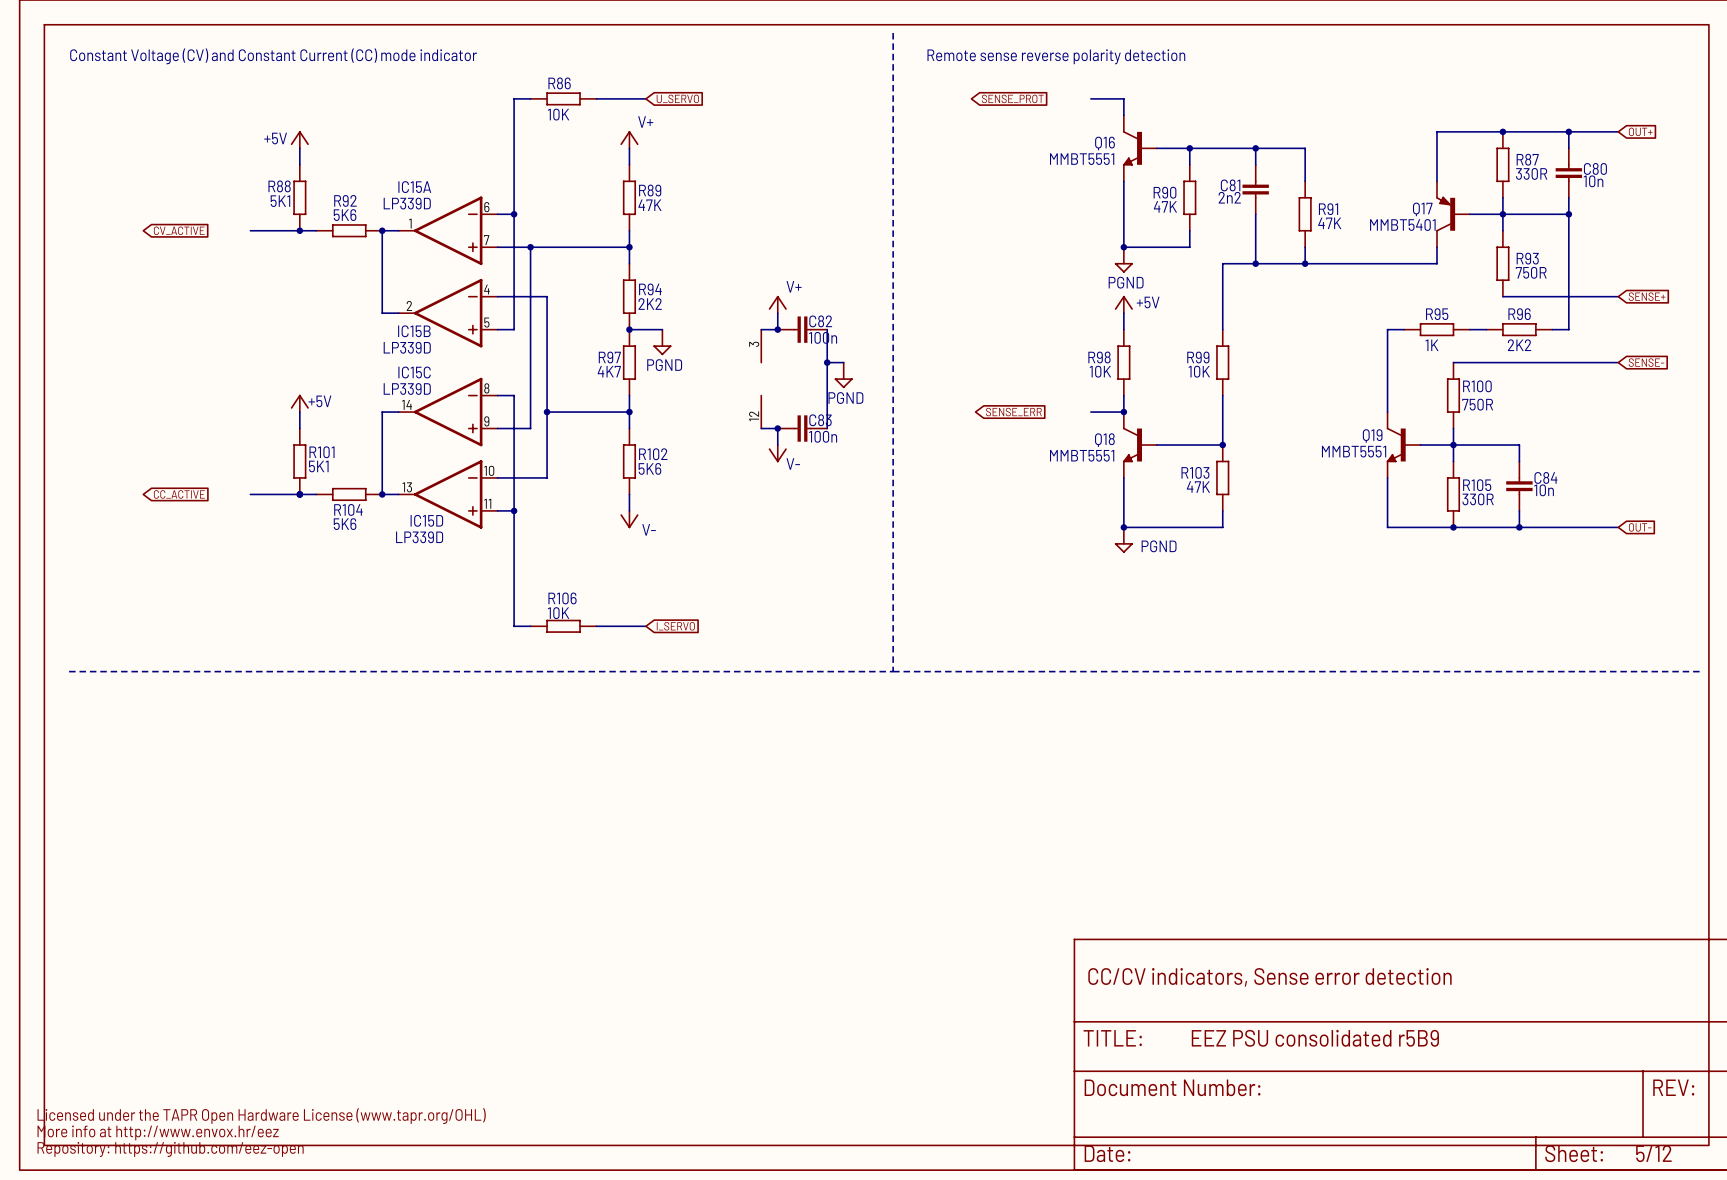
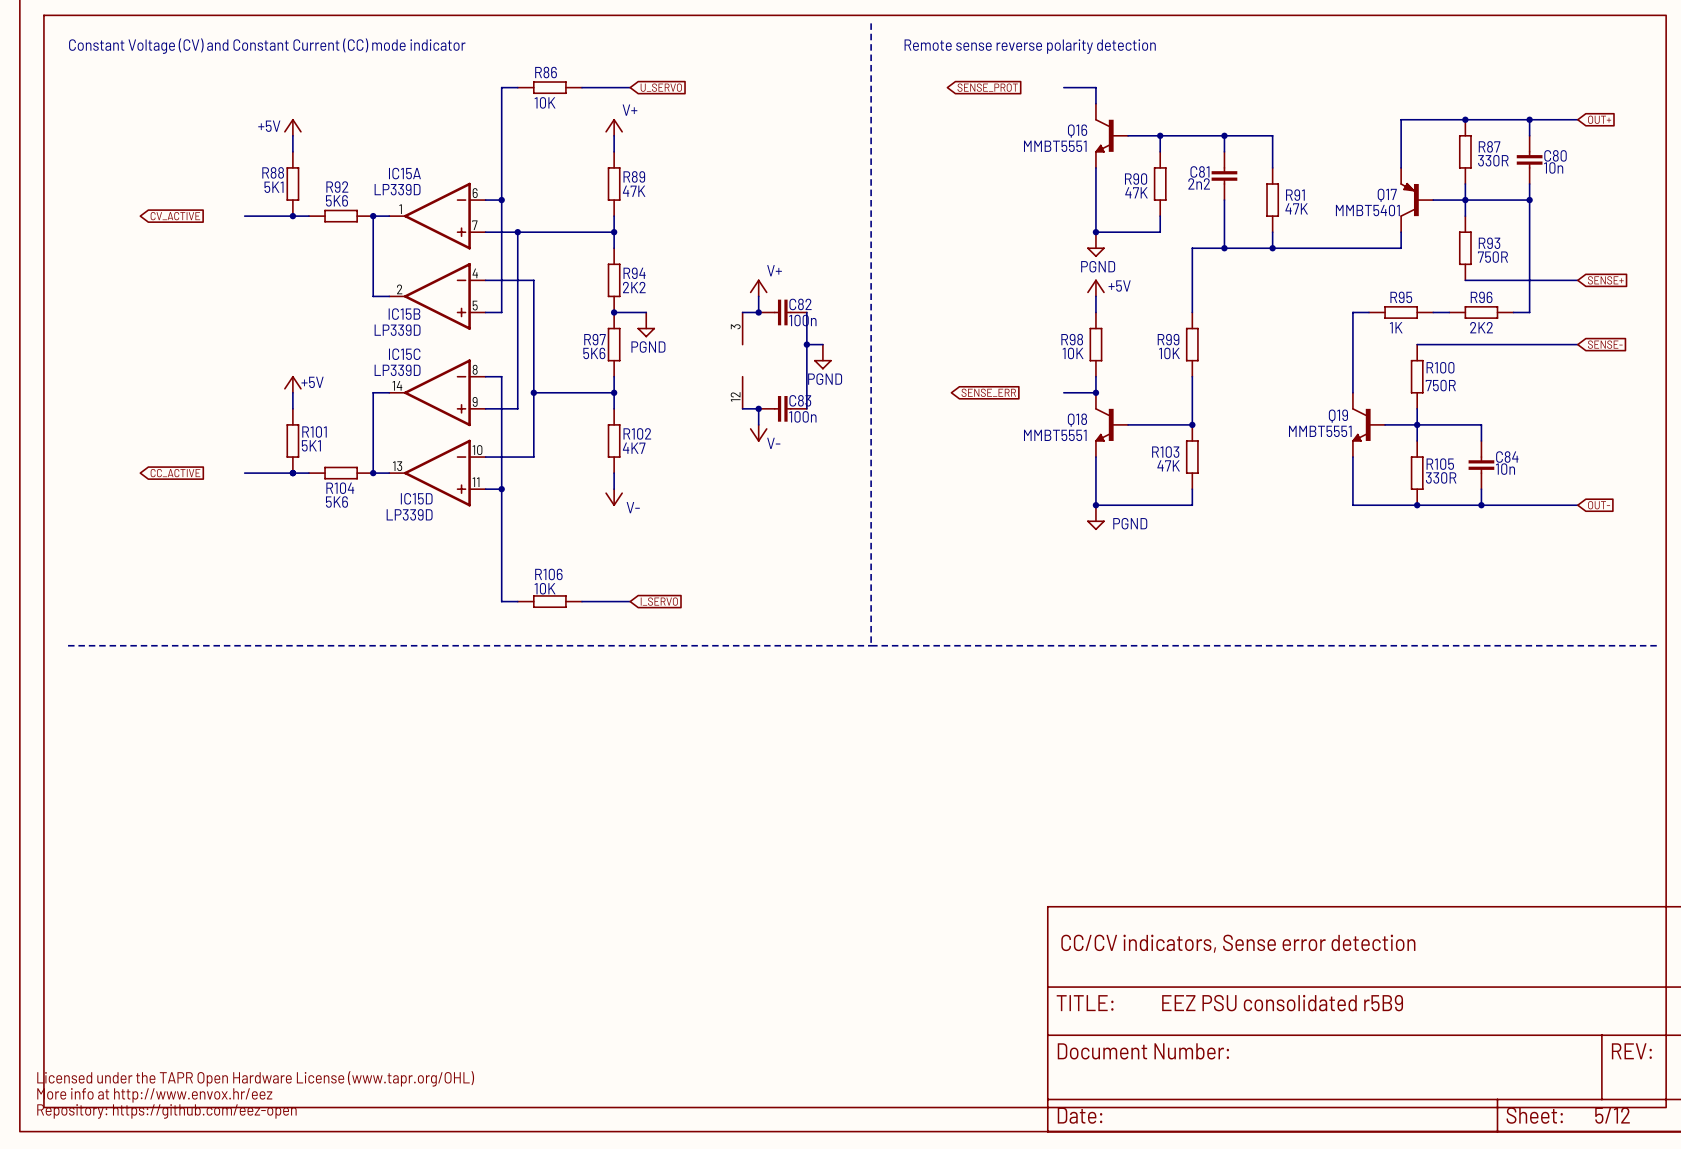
R97 value: 4K7 (609, 371) -> 5K6 (594, 353)
R102 value: 5K6 (649, 468) -> 4K7 (634, 448)

